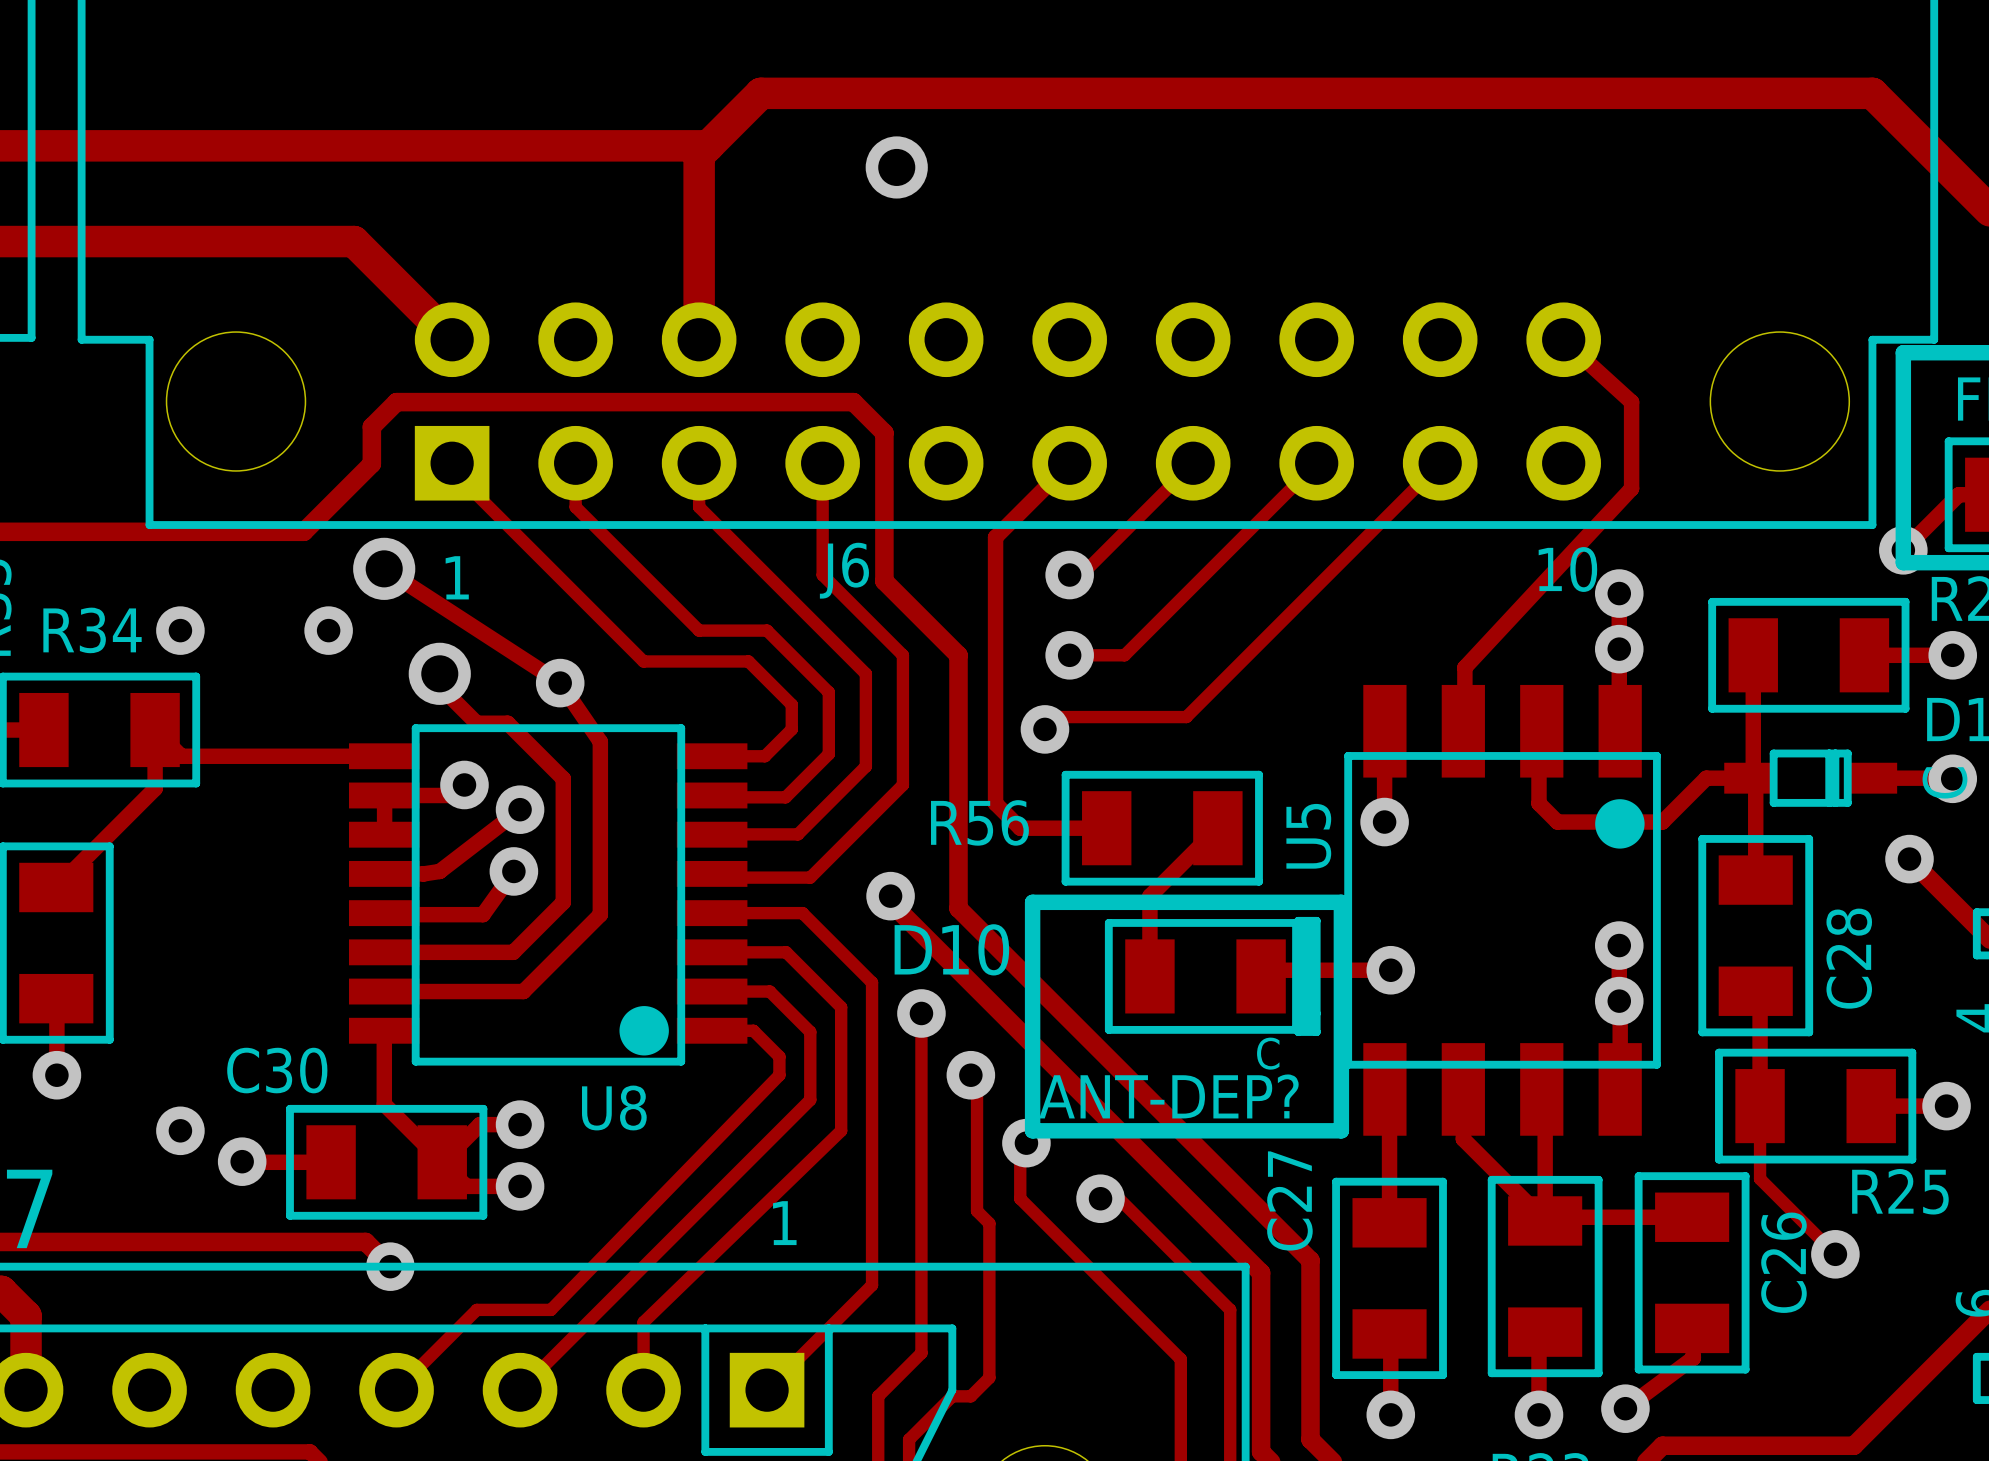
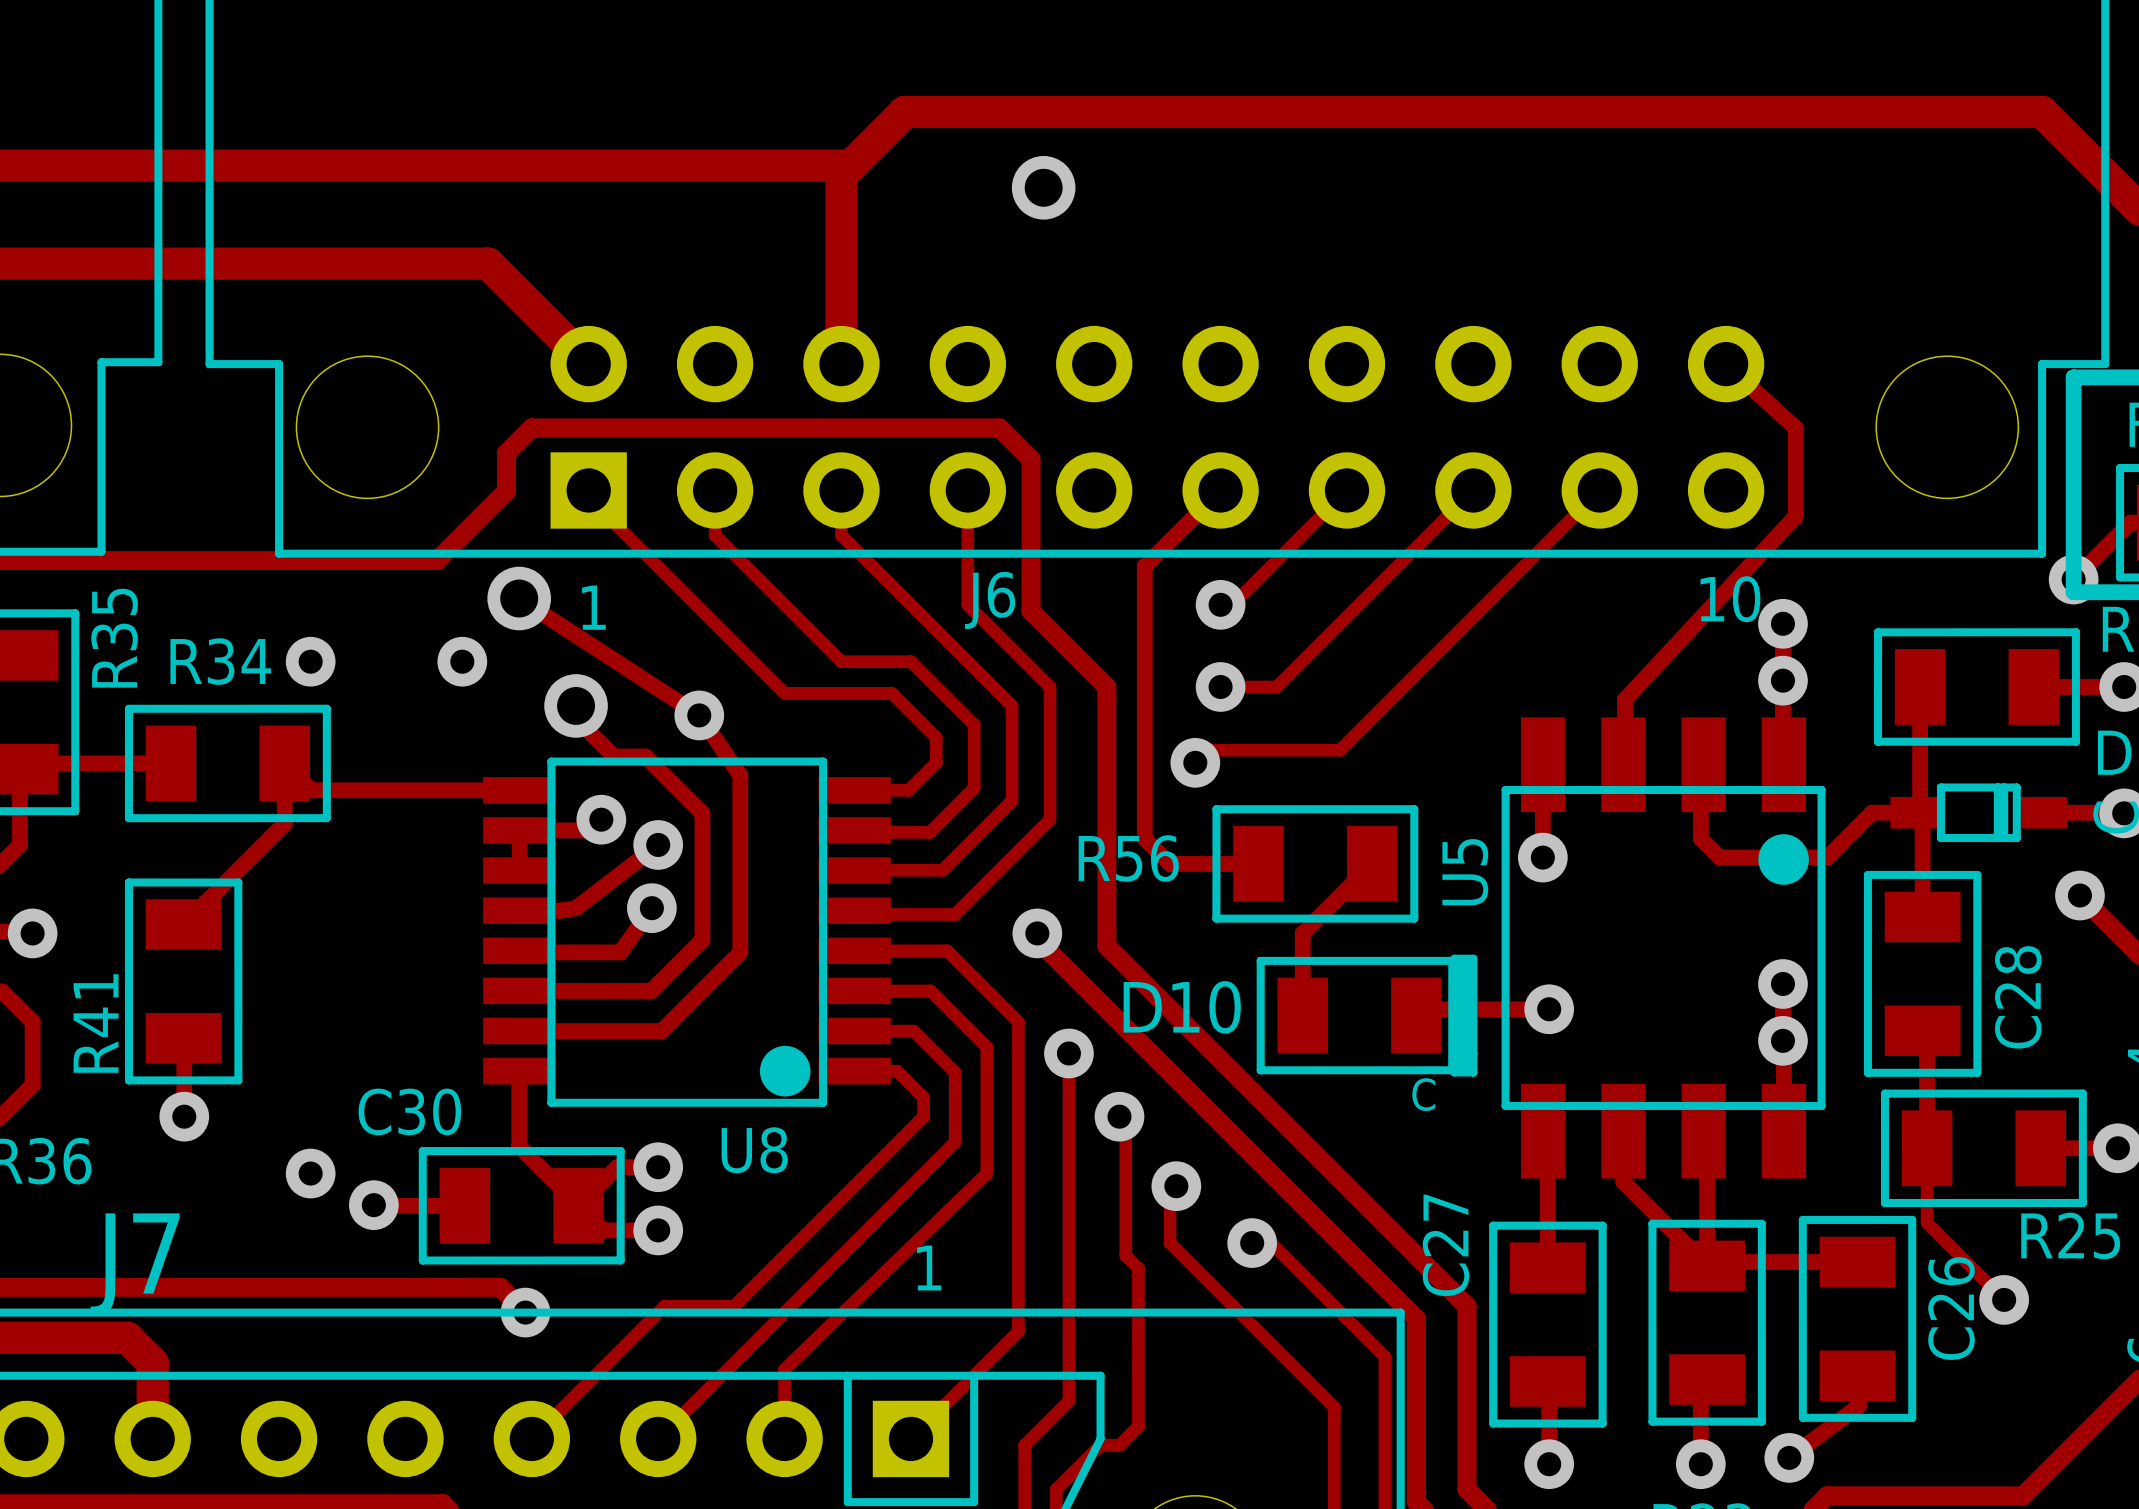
line: (1032, 902) (1032, 1130) (1341, 1130) (1341, 902) (1032, 902) -> none
D10 name position: D10 (951, 949) -> D10 (1182, 1007)
track: (779, 1075) (550, 1309) (476, 1309) -> (923, 1116) (734, 1306) (664, 1306) (613, 1356)
text: ANT-DEP? (1168, 1096) -> none

